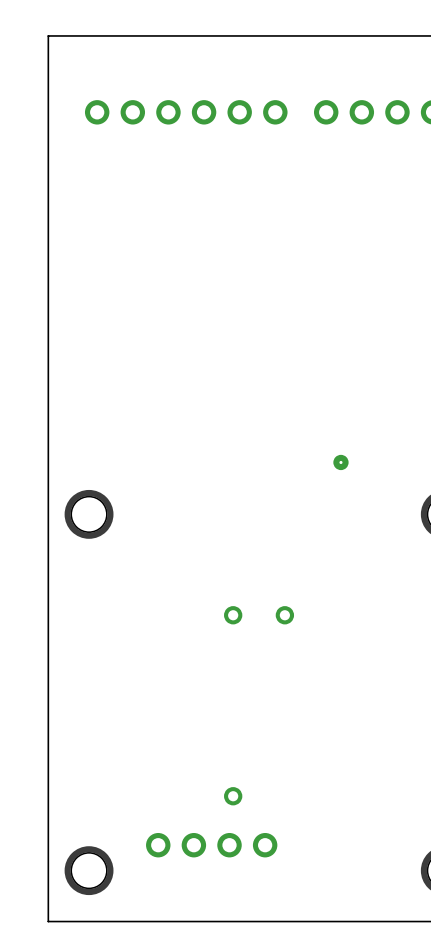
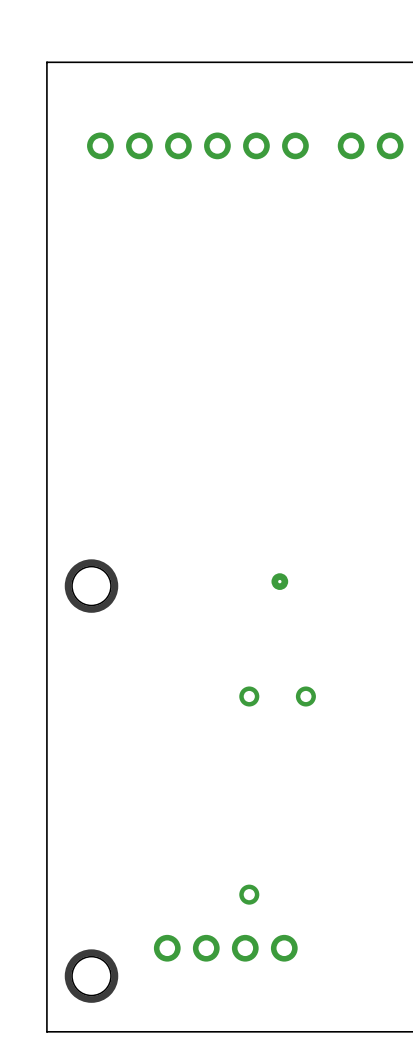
part position: (340, 462) -> (279, 581)

